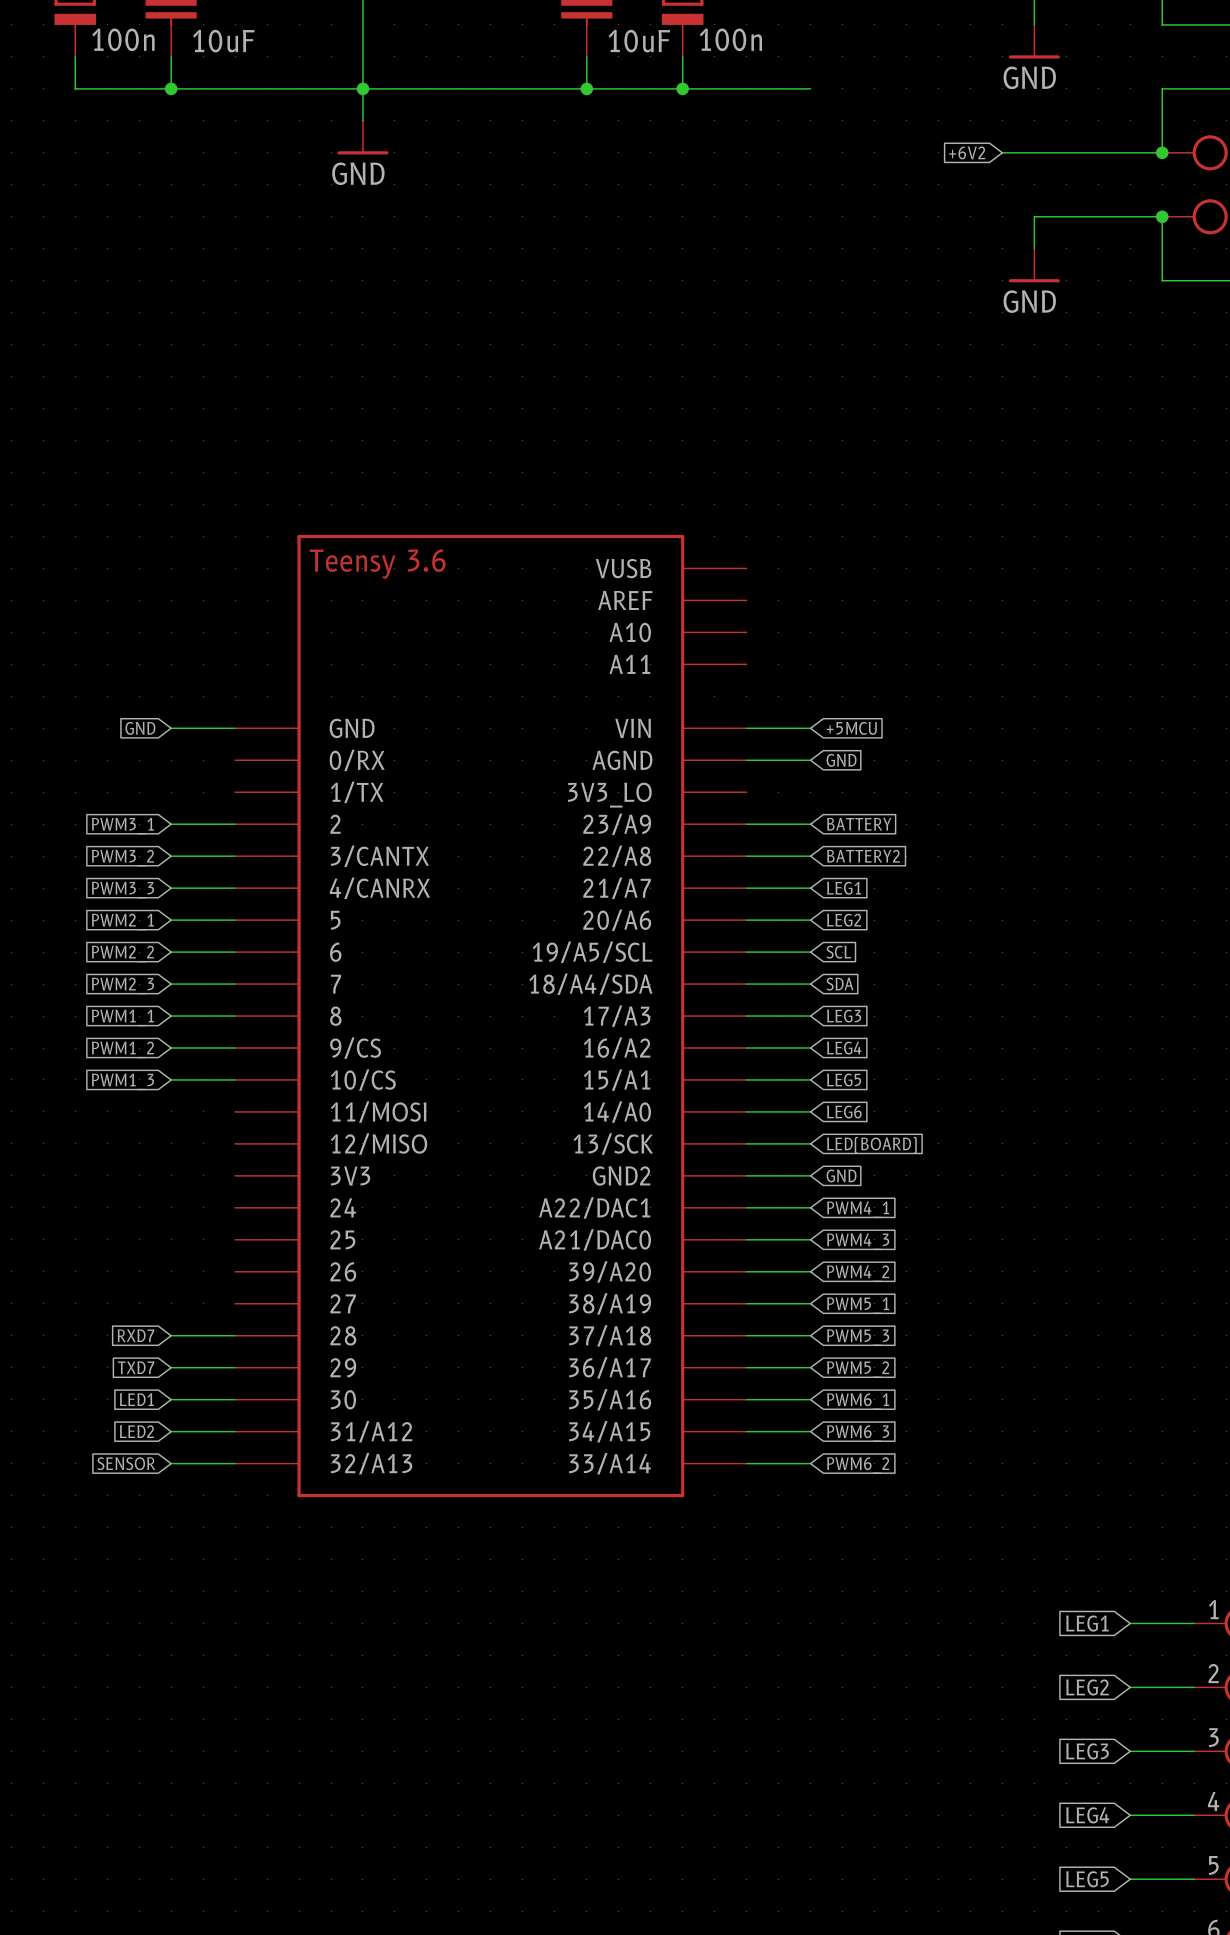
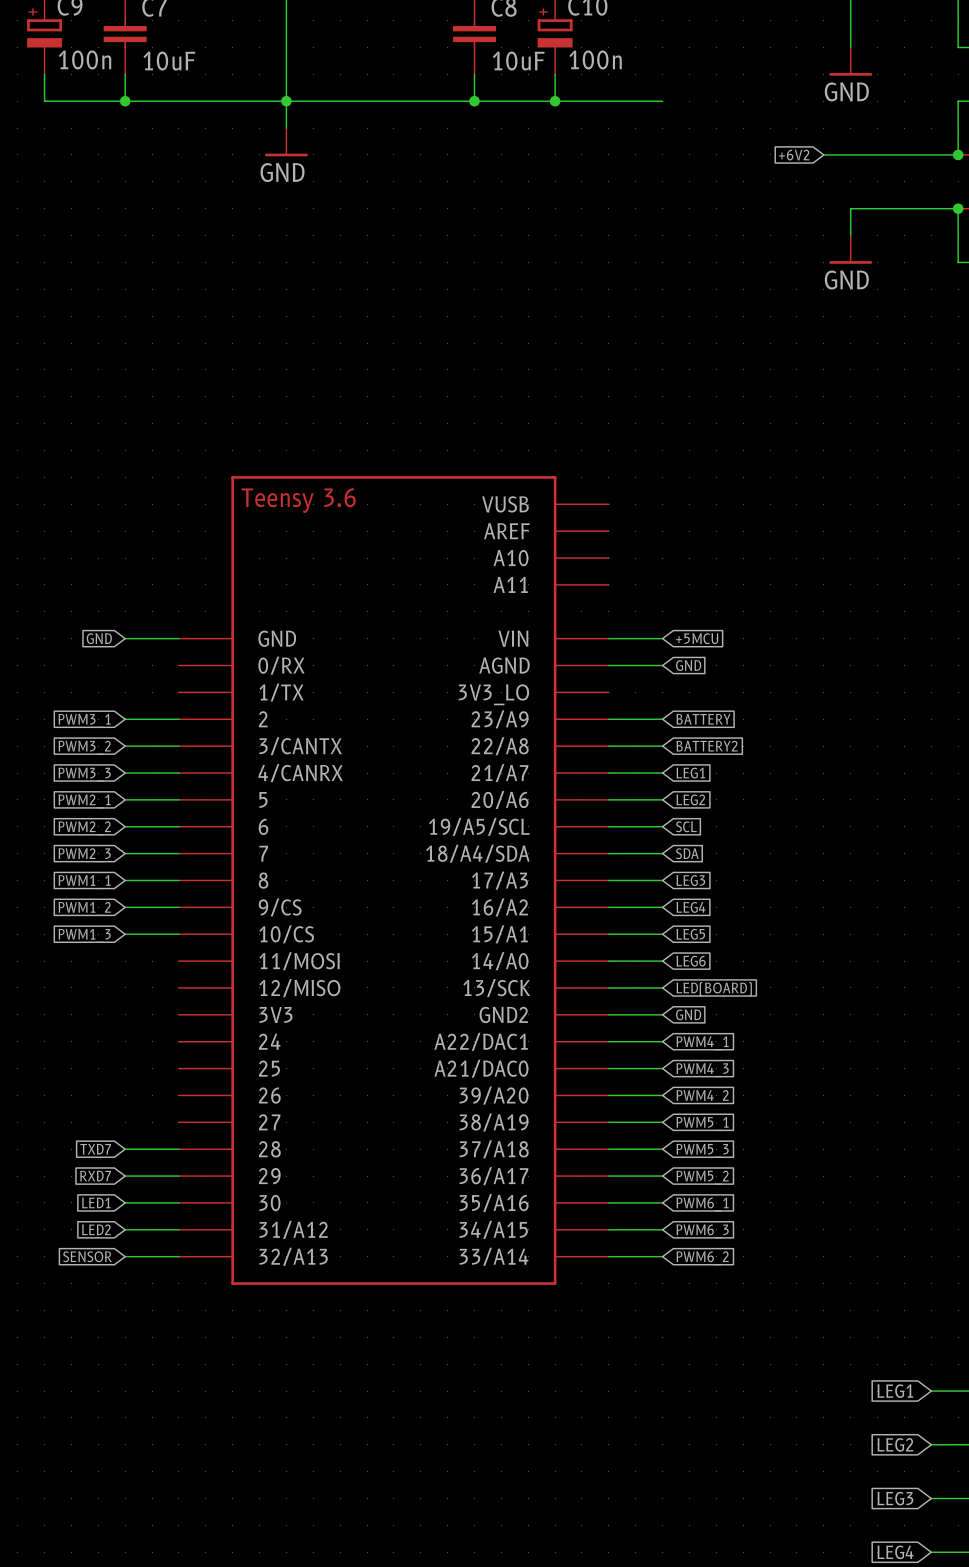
global label: RXD7 (135, 1335) -> TXD7 (95, 1149)
global label: TXD7 (136, 1367) -> RXD7 (95, 1176)

